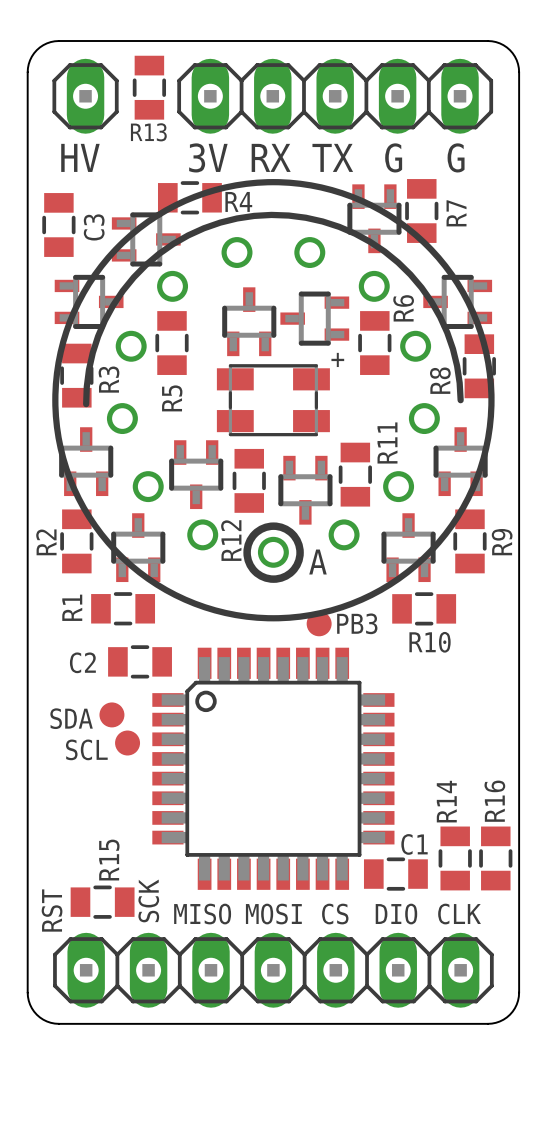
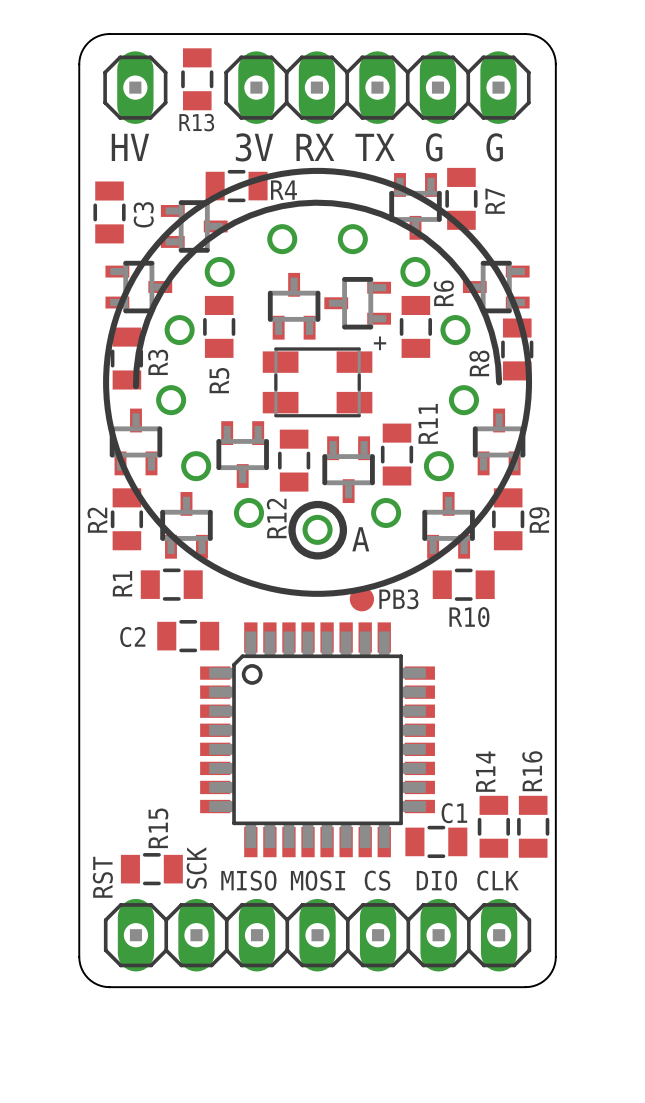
part: (111, 714) -> none
text: SDA (71, 718) -> none
part: (127, 743) -> none
text: SCL (86, 749) -> none

